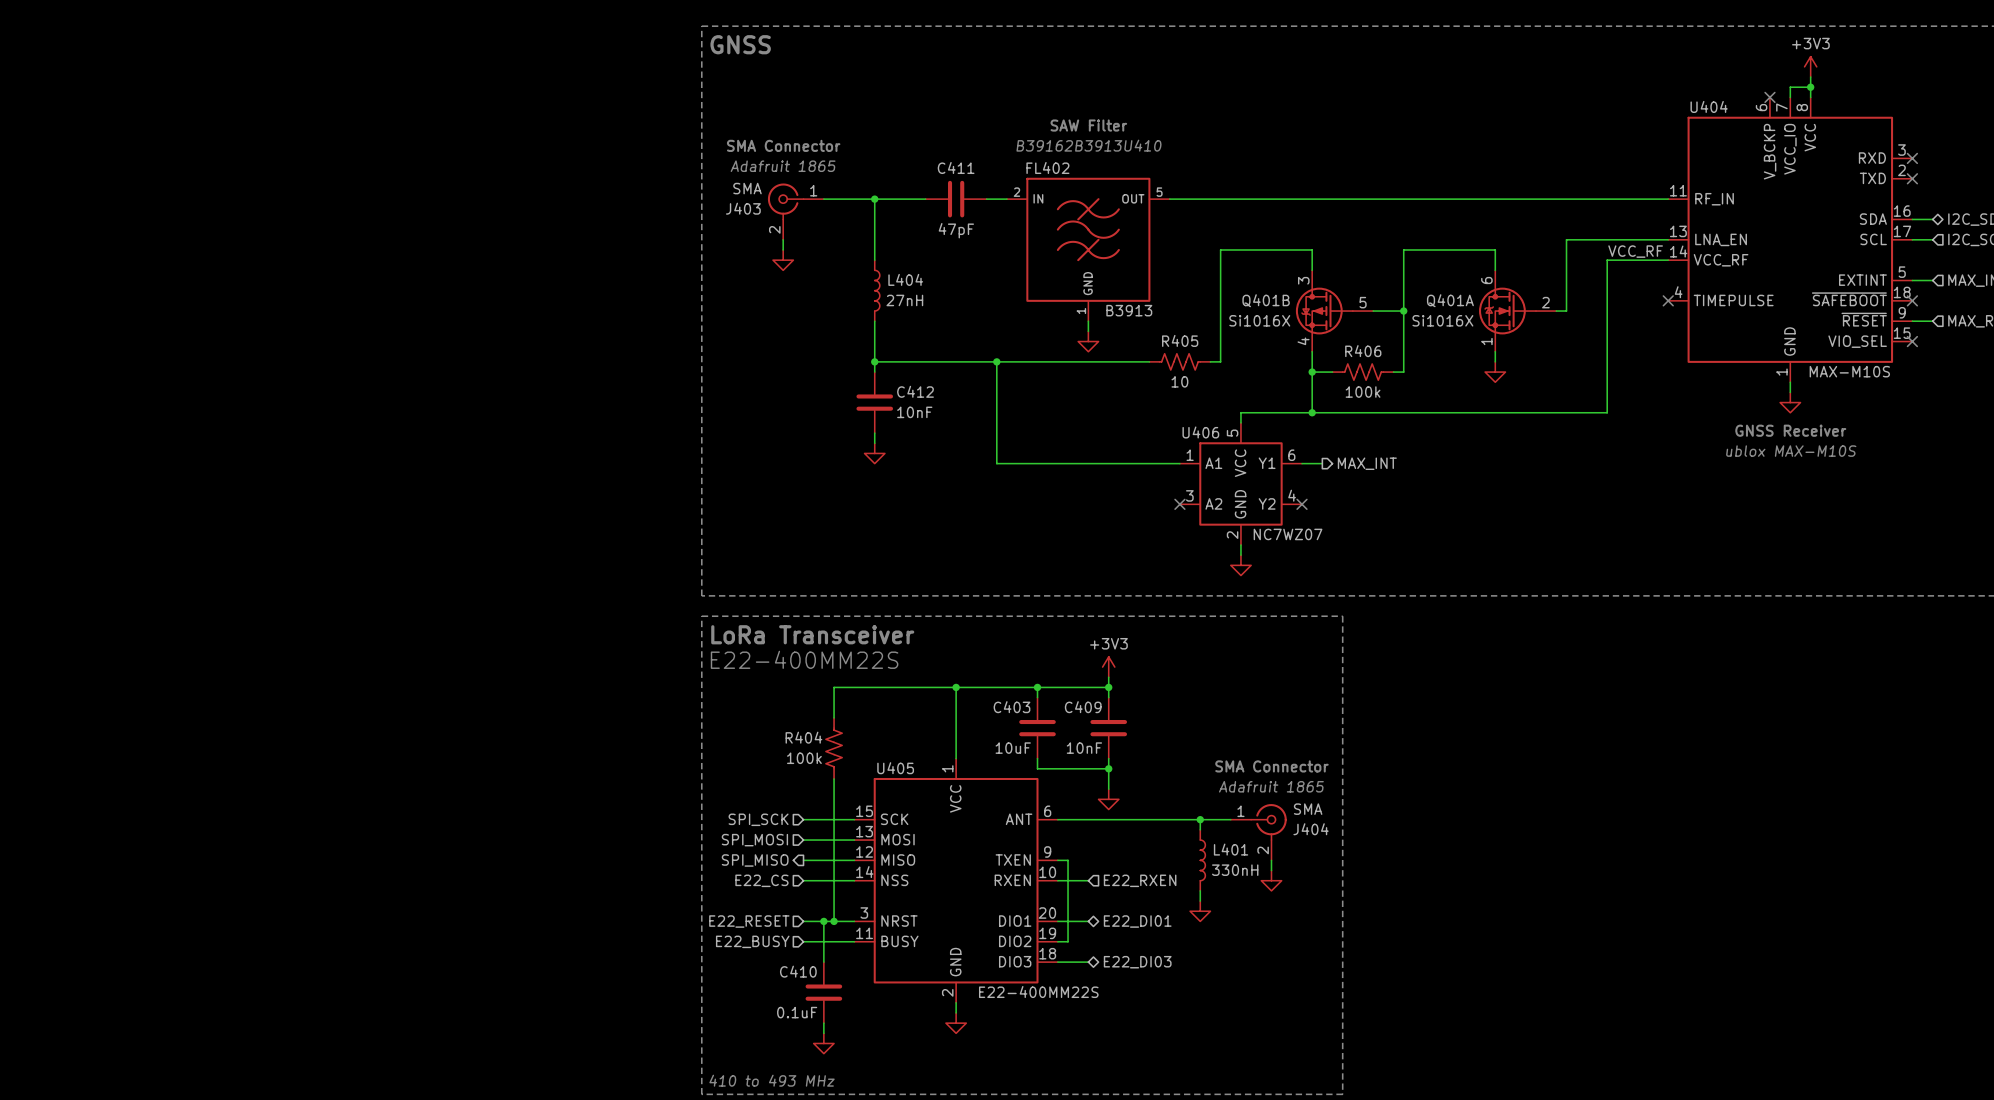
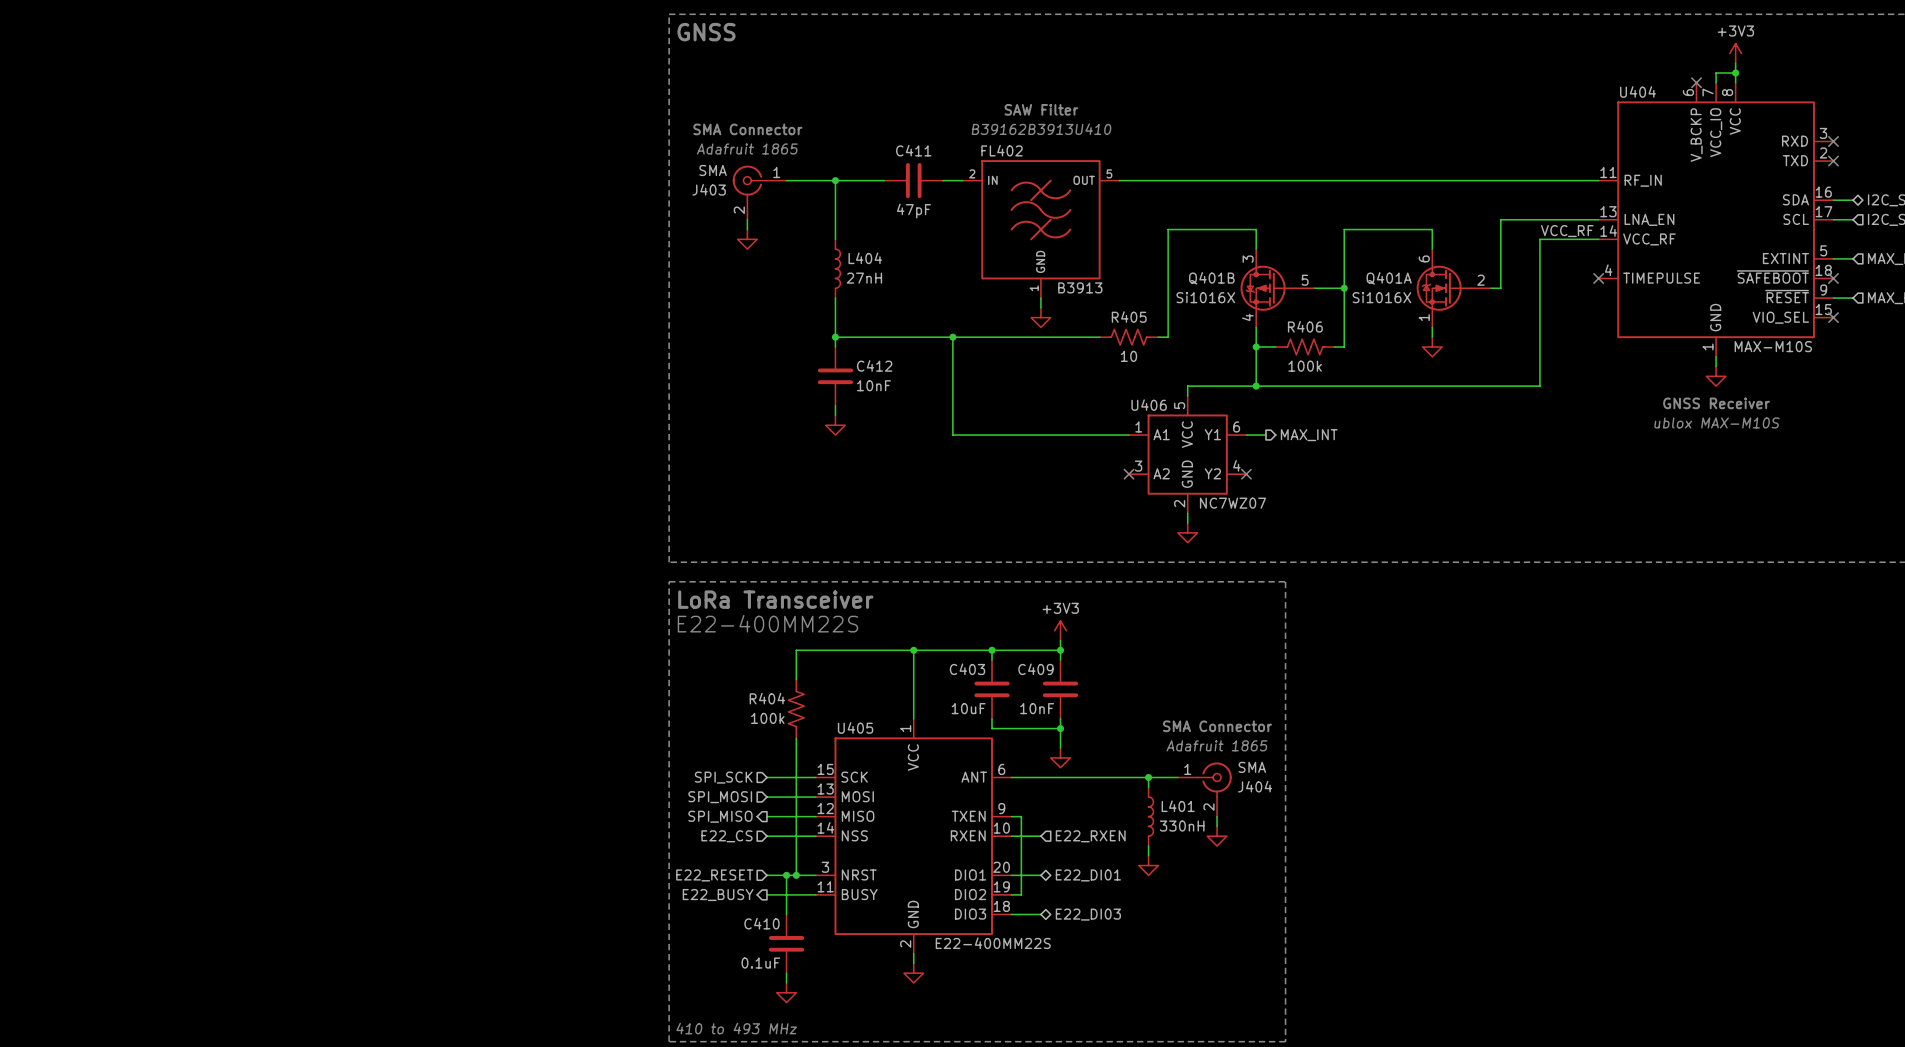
hierarchical label shape: input (752, 941) -> output (718, 895)

